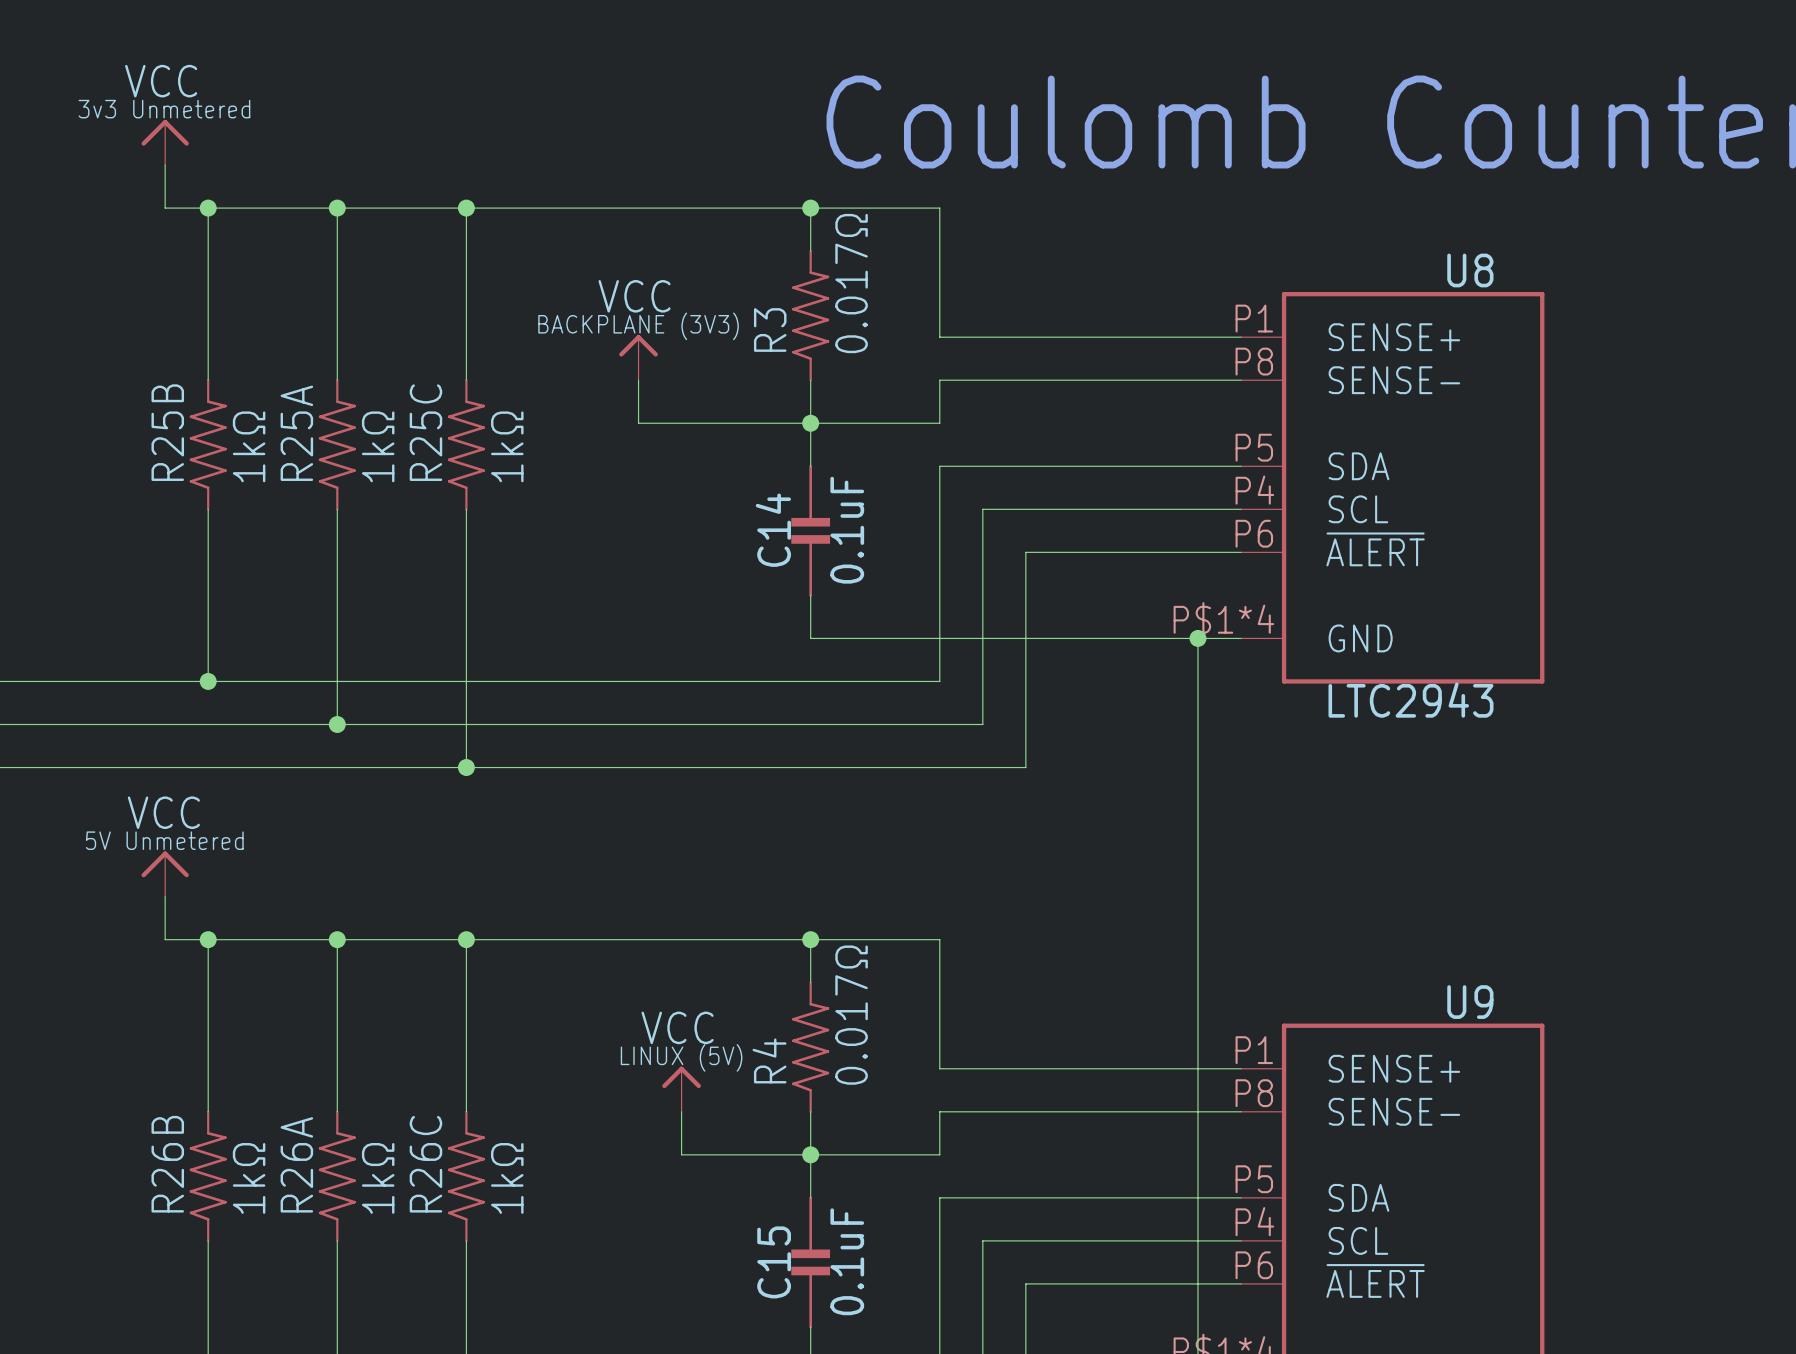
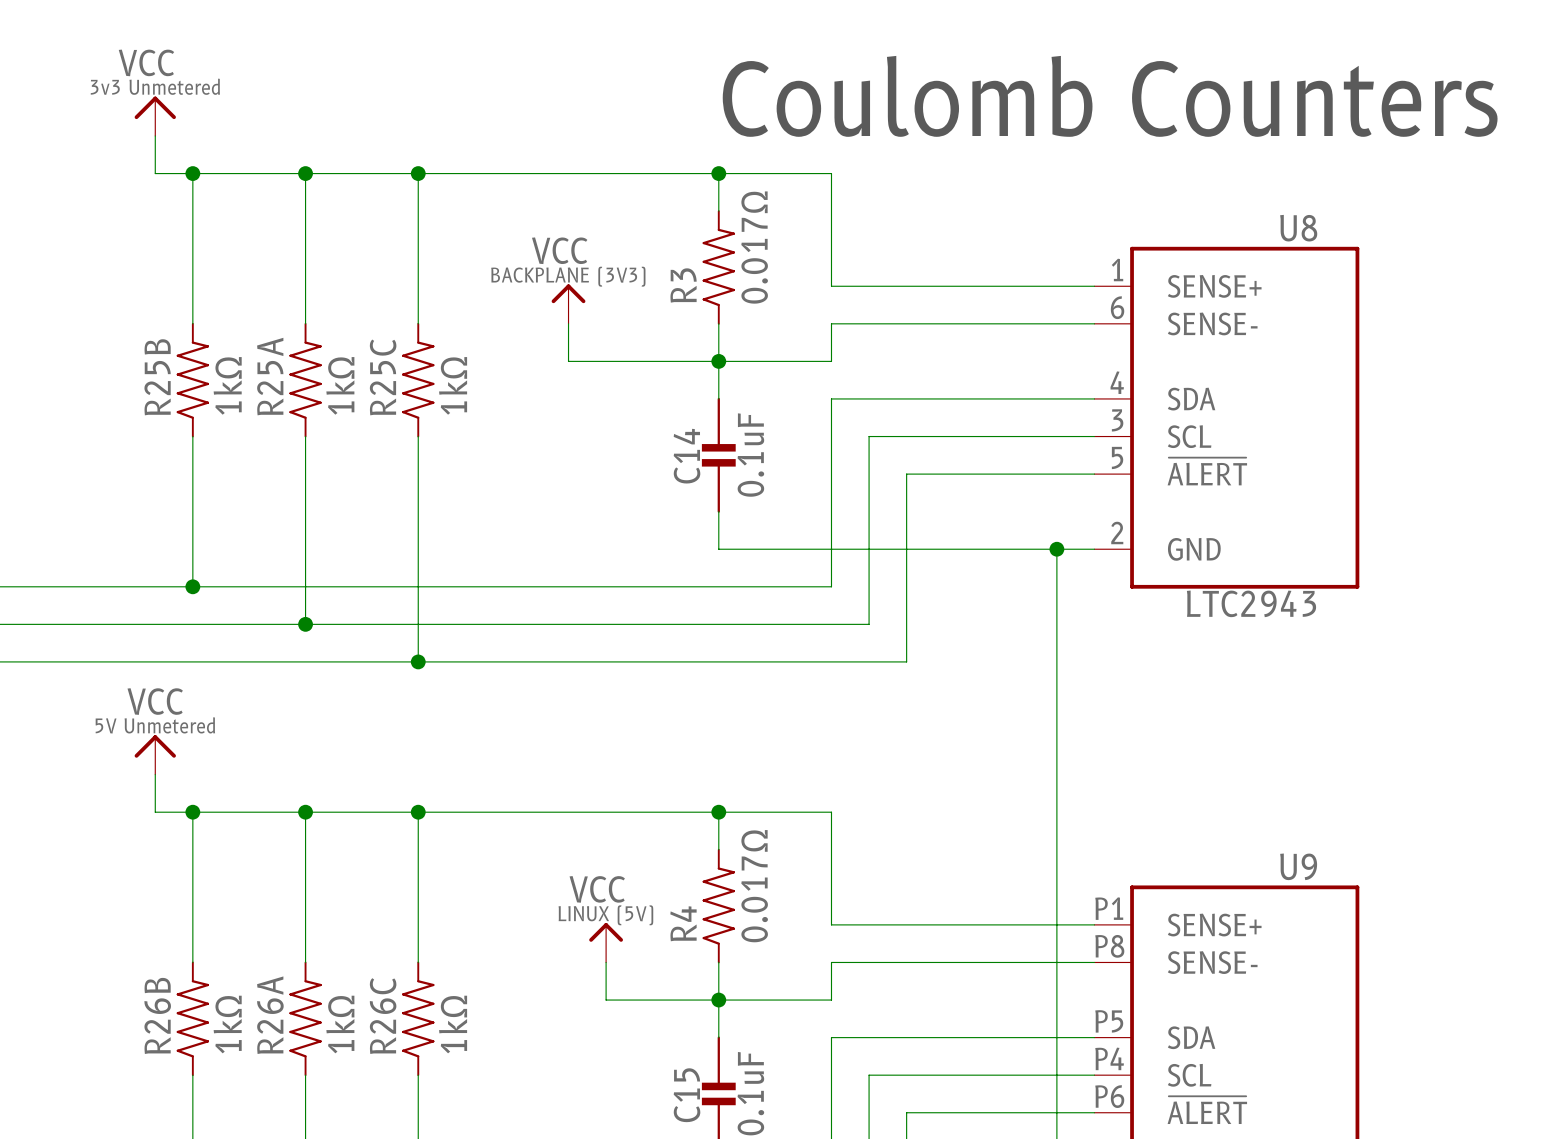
U8 pin number: P1 (1254, 318) -> 1 (1117, 269)
U8 pin number: P8 (1254, 361) -> 6 (1117, 307)
U8 pin number: P5 (1254, 447) -> 4 (1117, 382)
U8 pin number: P4 (1254, 490) -> 3 (1117, 420)
U8 pin number: P6 (1254, 533) -> 5 (1117, 457)
U8 pin number: P$1*4 (1223, 619) -> 2 (1117, 532)

